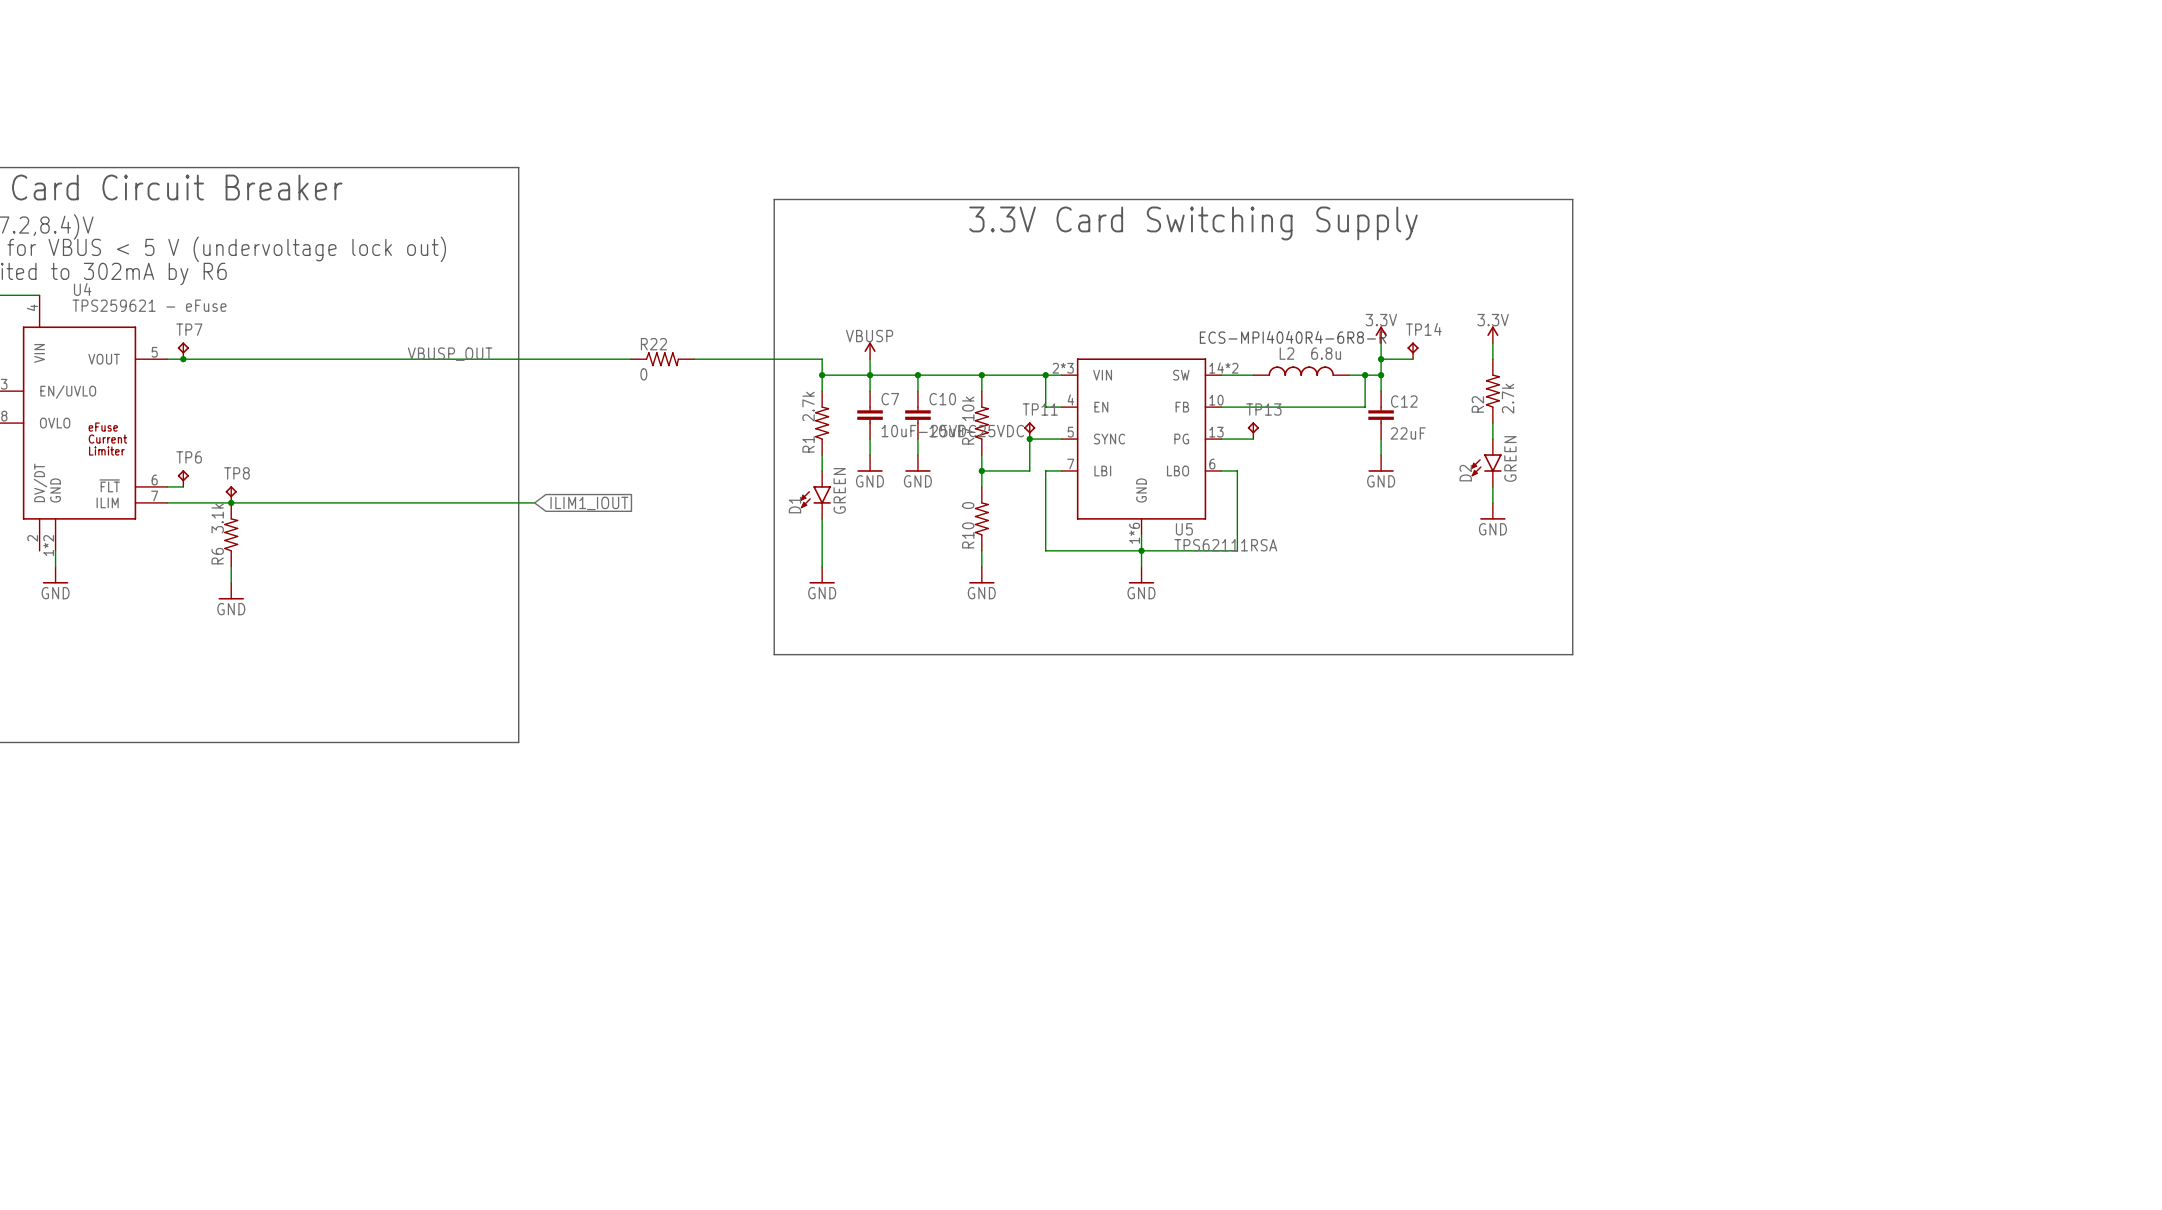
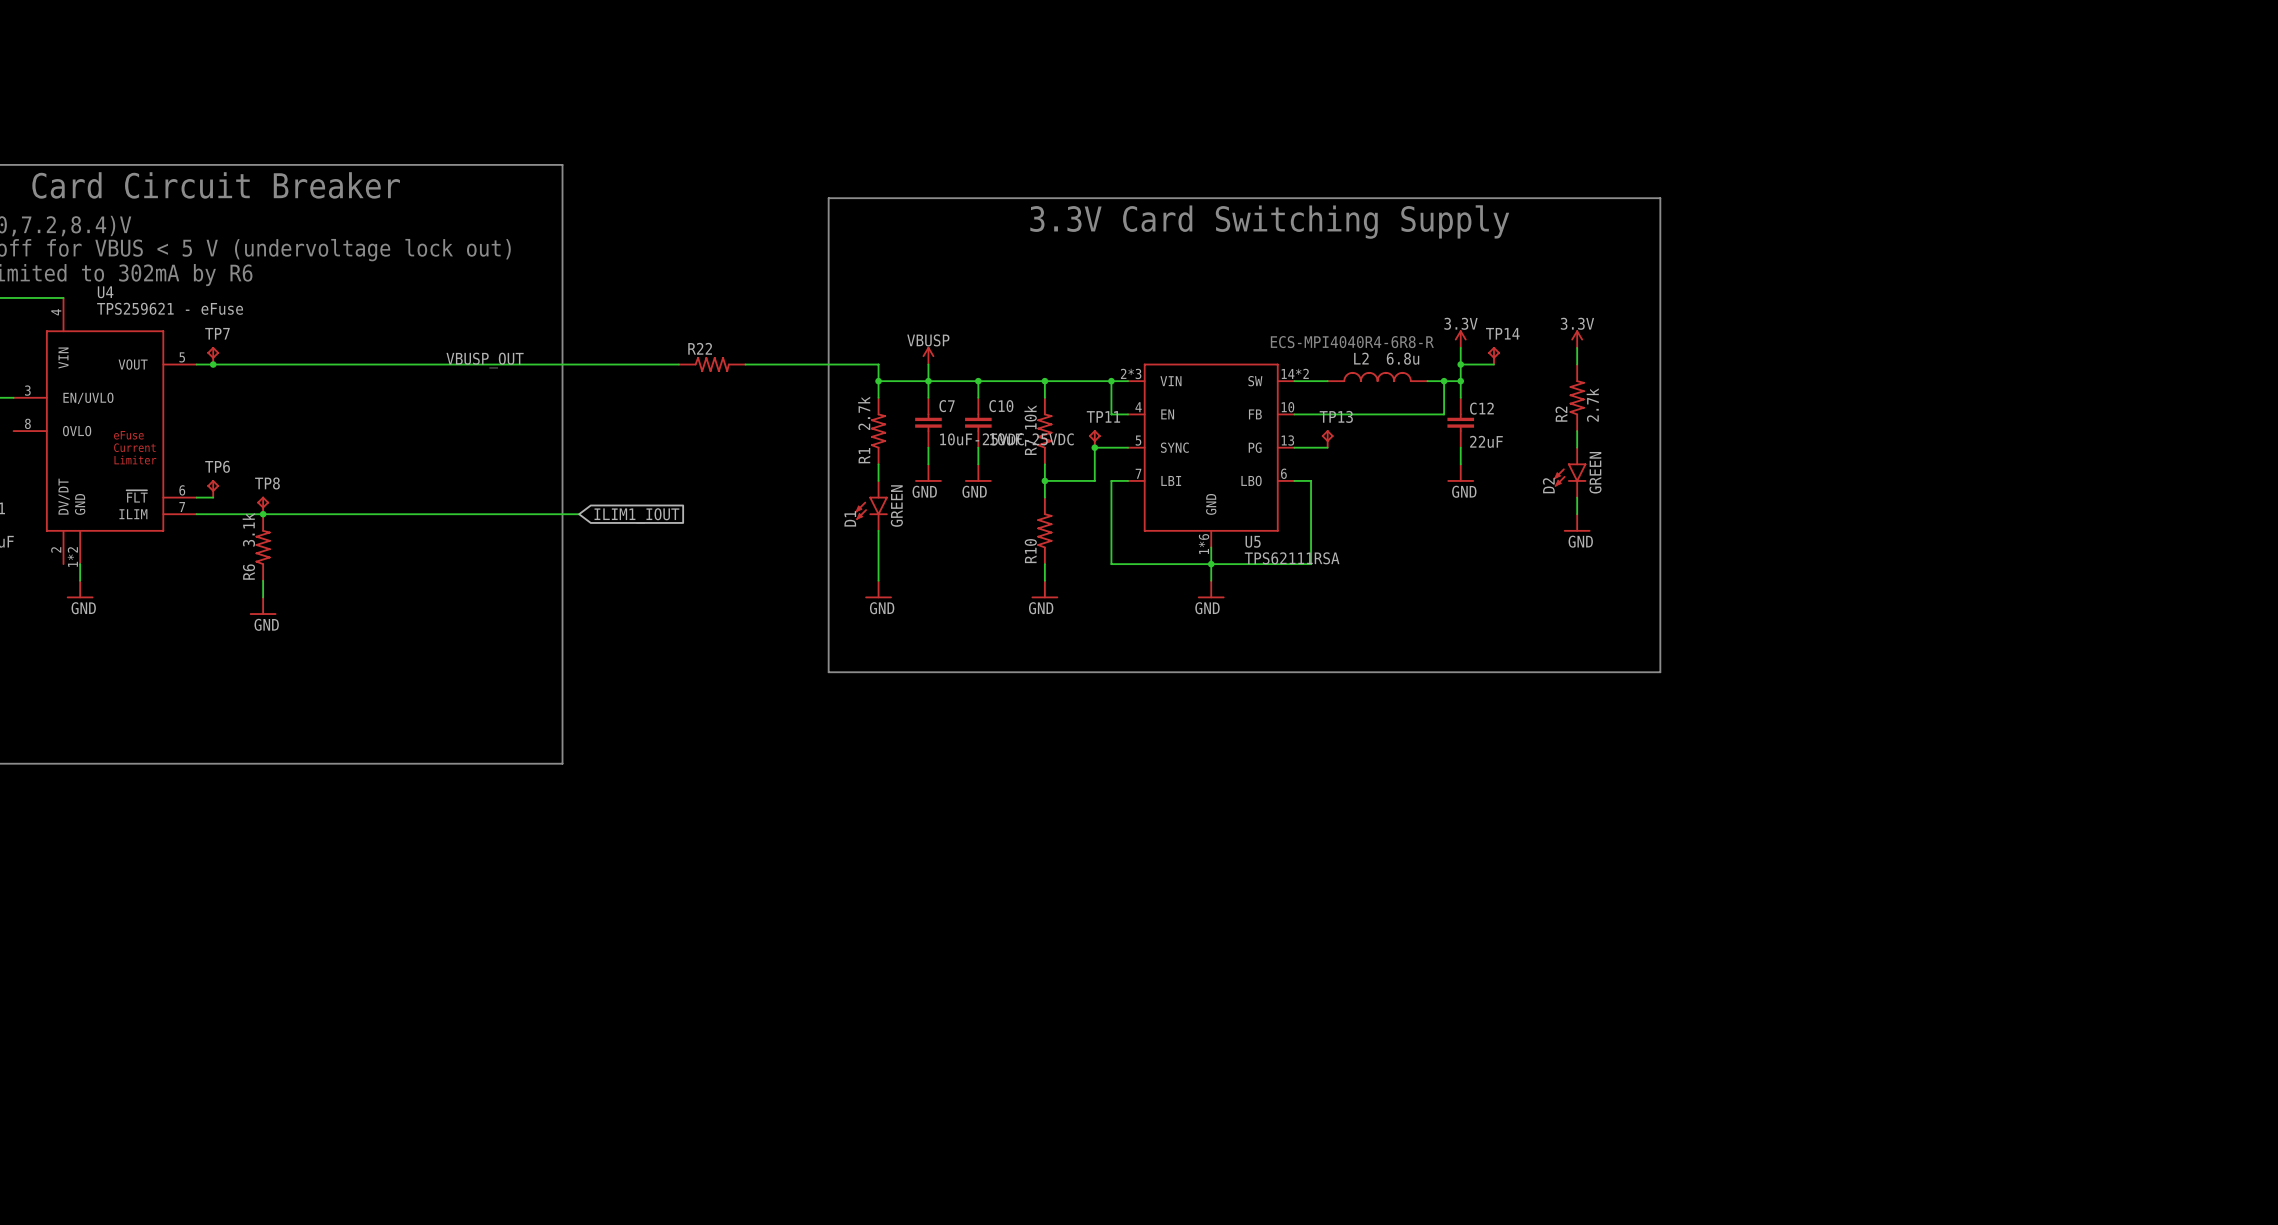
R22 value: 0 (643, 374) -> none
R10 value: 0 (968, 505) -> none

